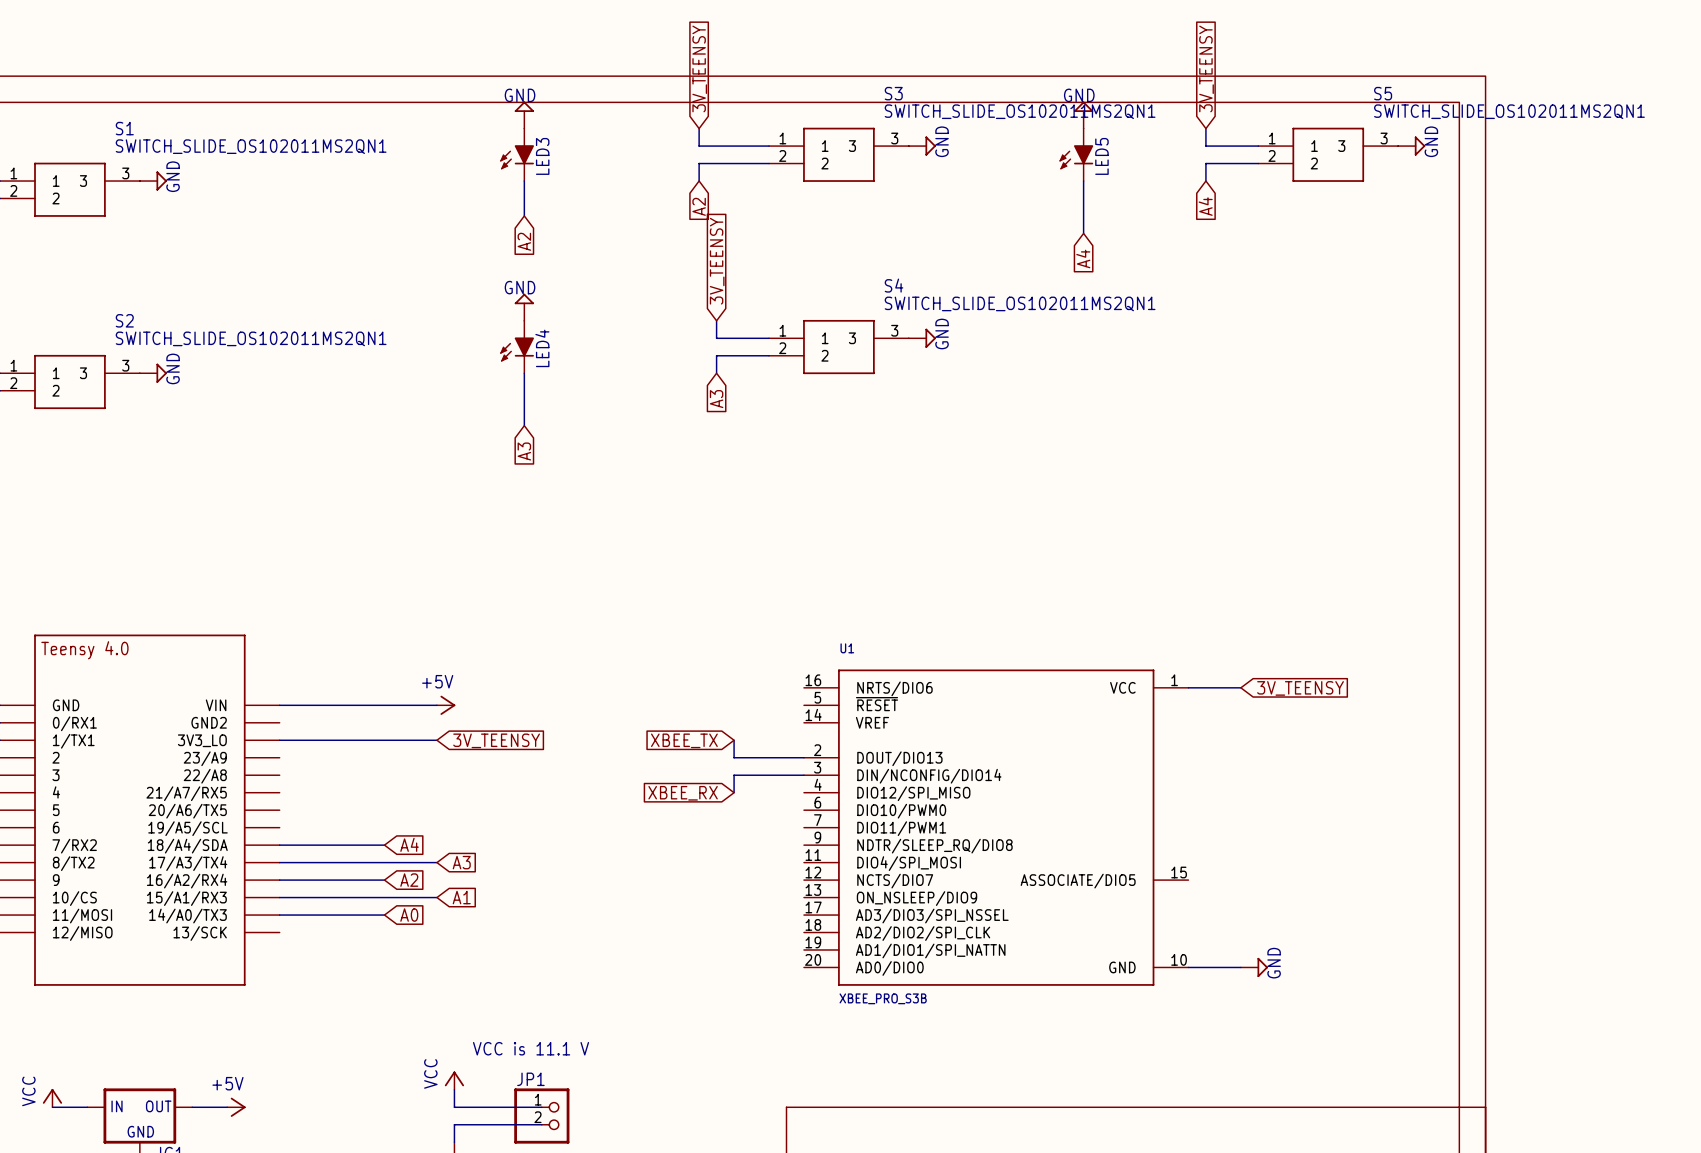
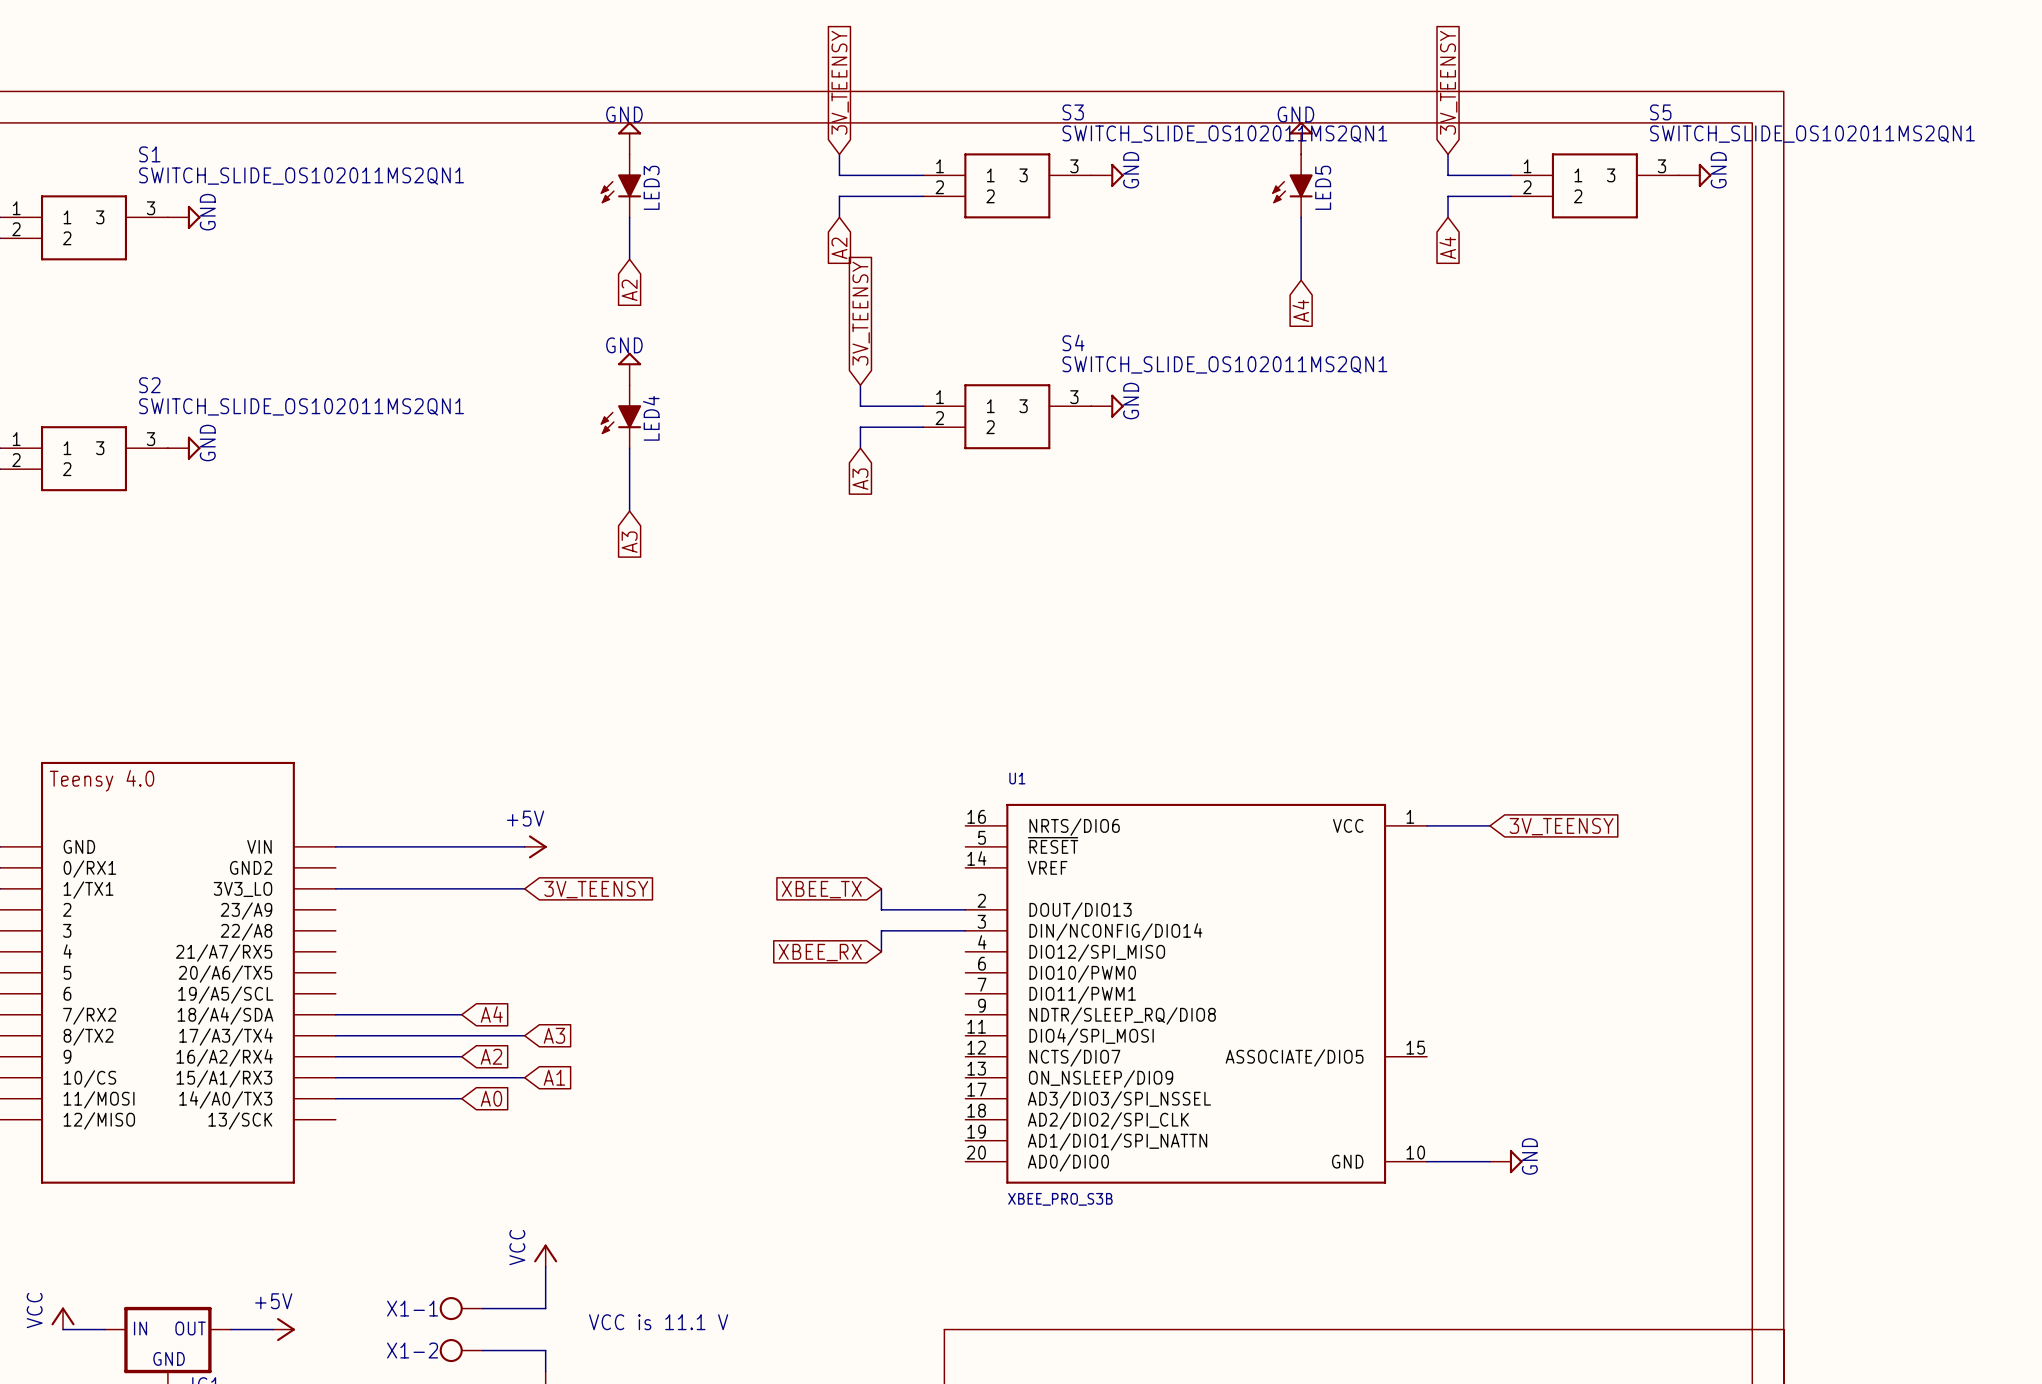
text position: VCC is 11.1 V (531, 1048) -> VCC is 11.1 V (658, 1322)
wire: none -> (545, 1266) (545, 1308) (482, 1308)
power symbol position: VCC (454, 1080) -> VCC (545, 1255)
X1-1: none -> (461, 1308)
wire: (454, 1089) (454, 1107) (541, 1107) -> none
JP1: (541, 1116) -> none
X1-2: none -> (461, 1350)
wire: (454, 1124) (541, 1124) -> (545, 1350) (482, 1350)

